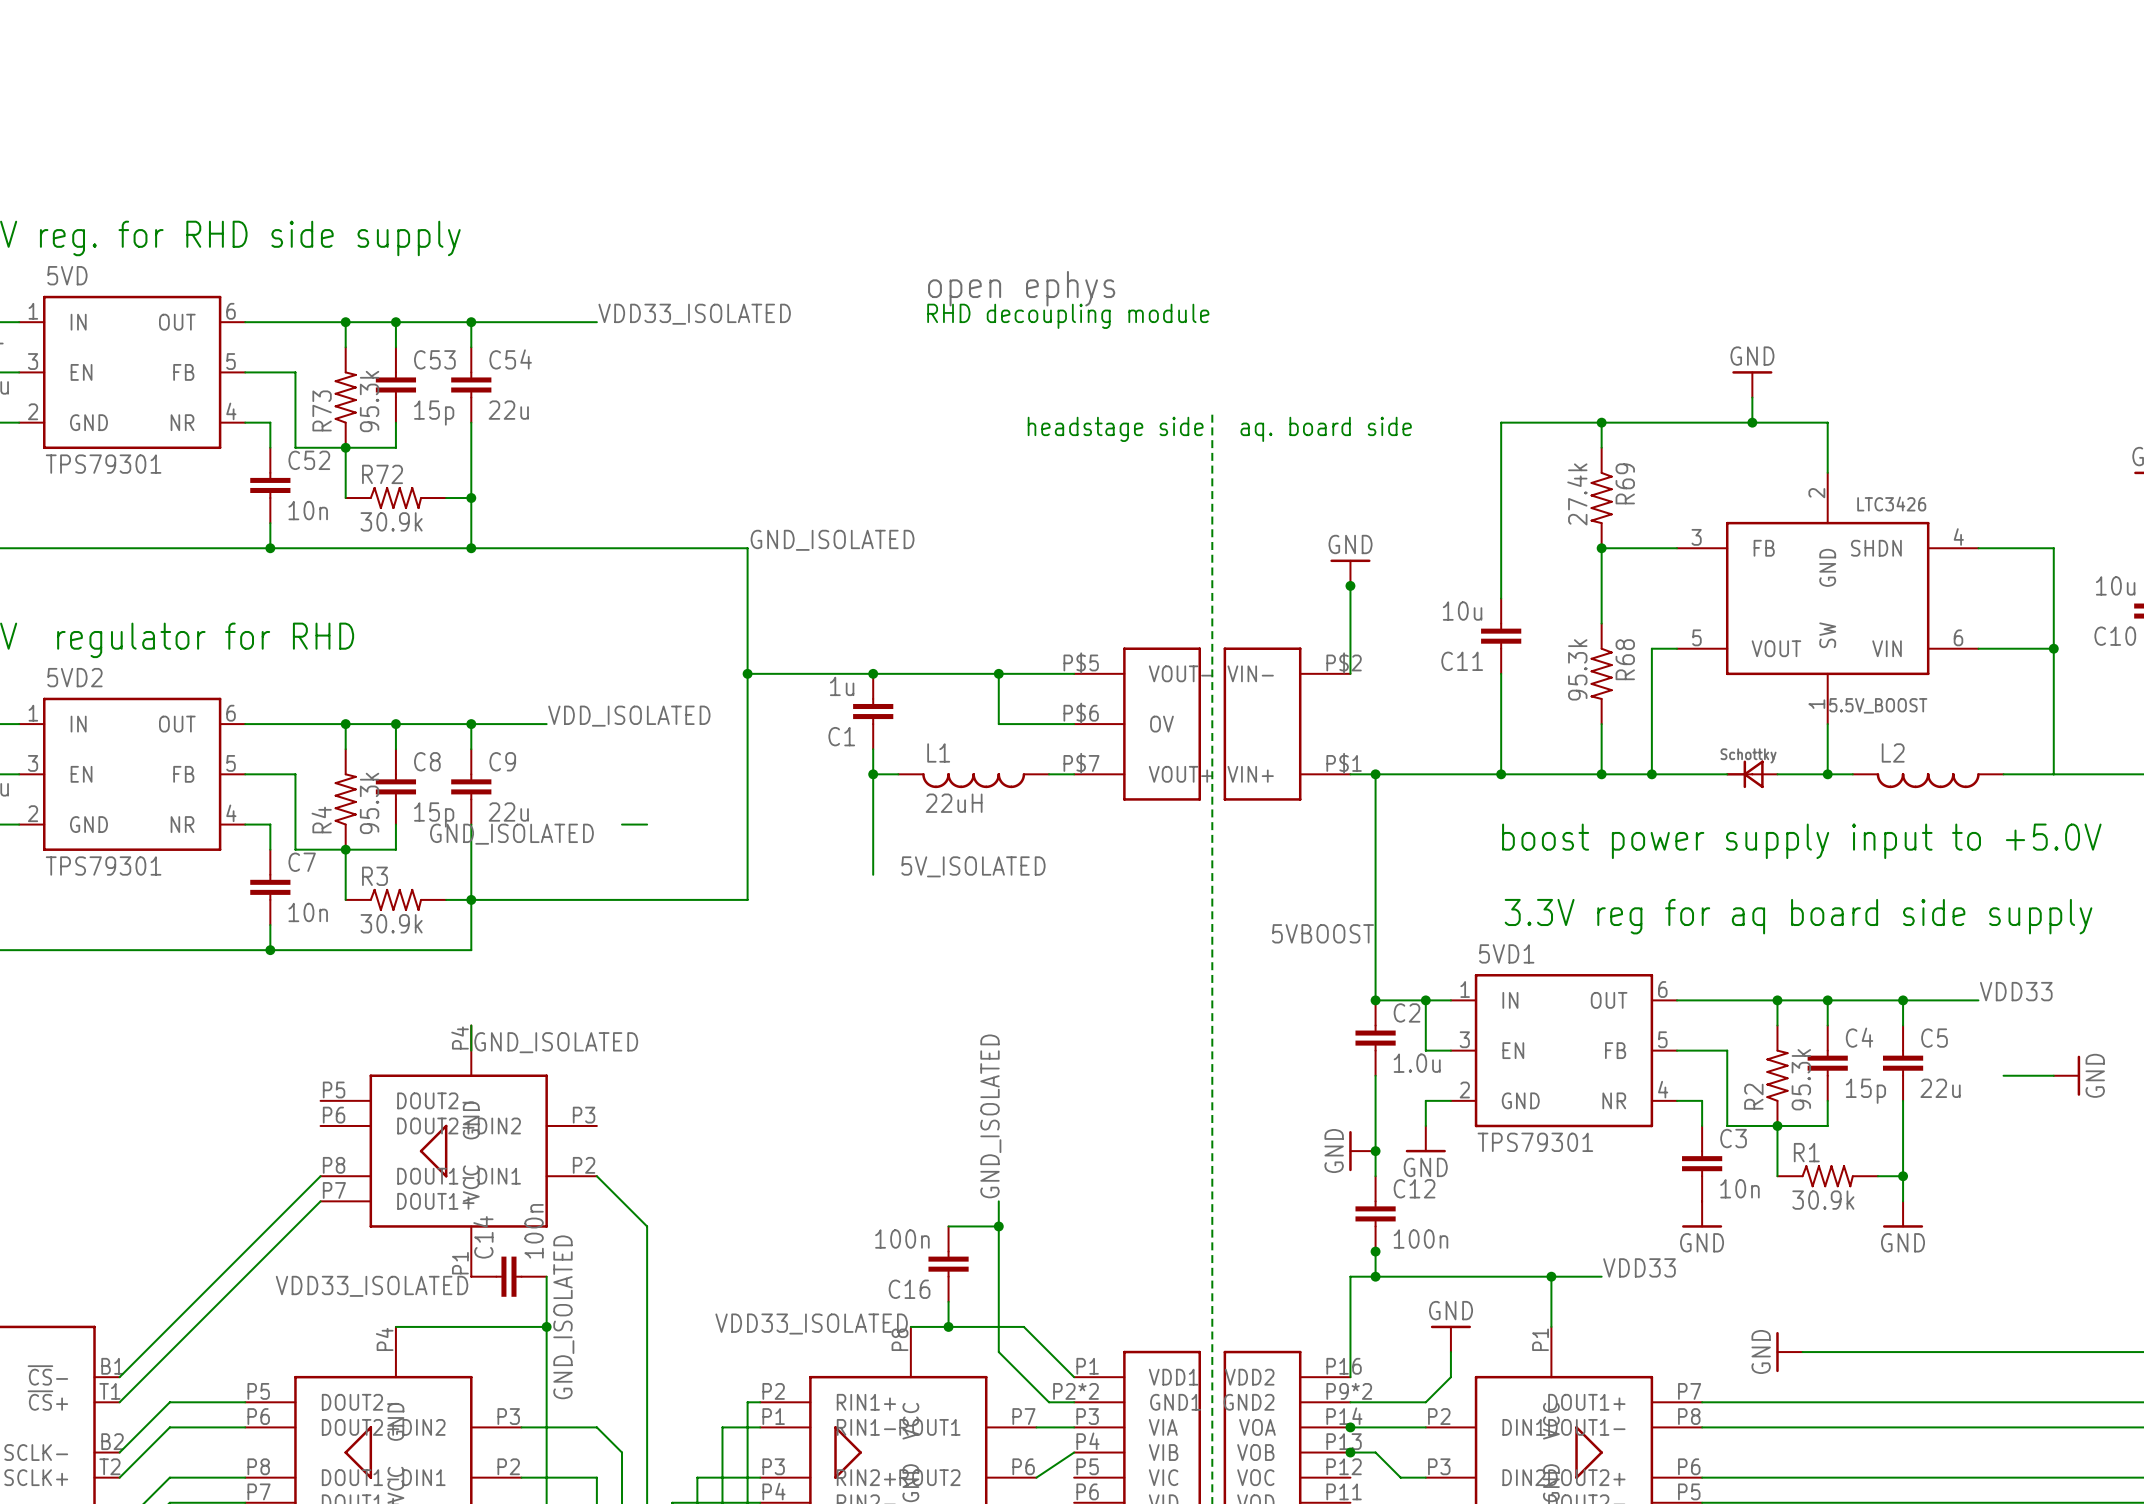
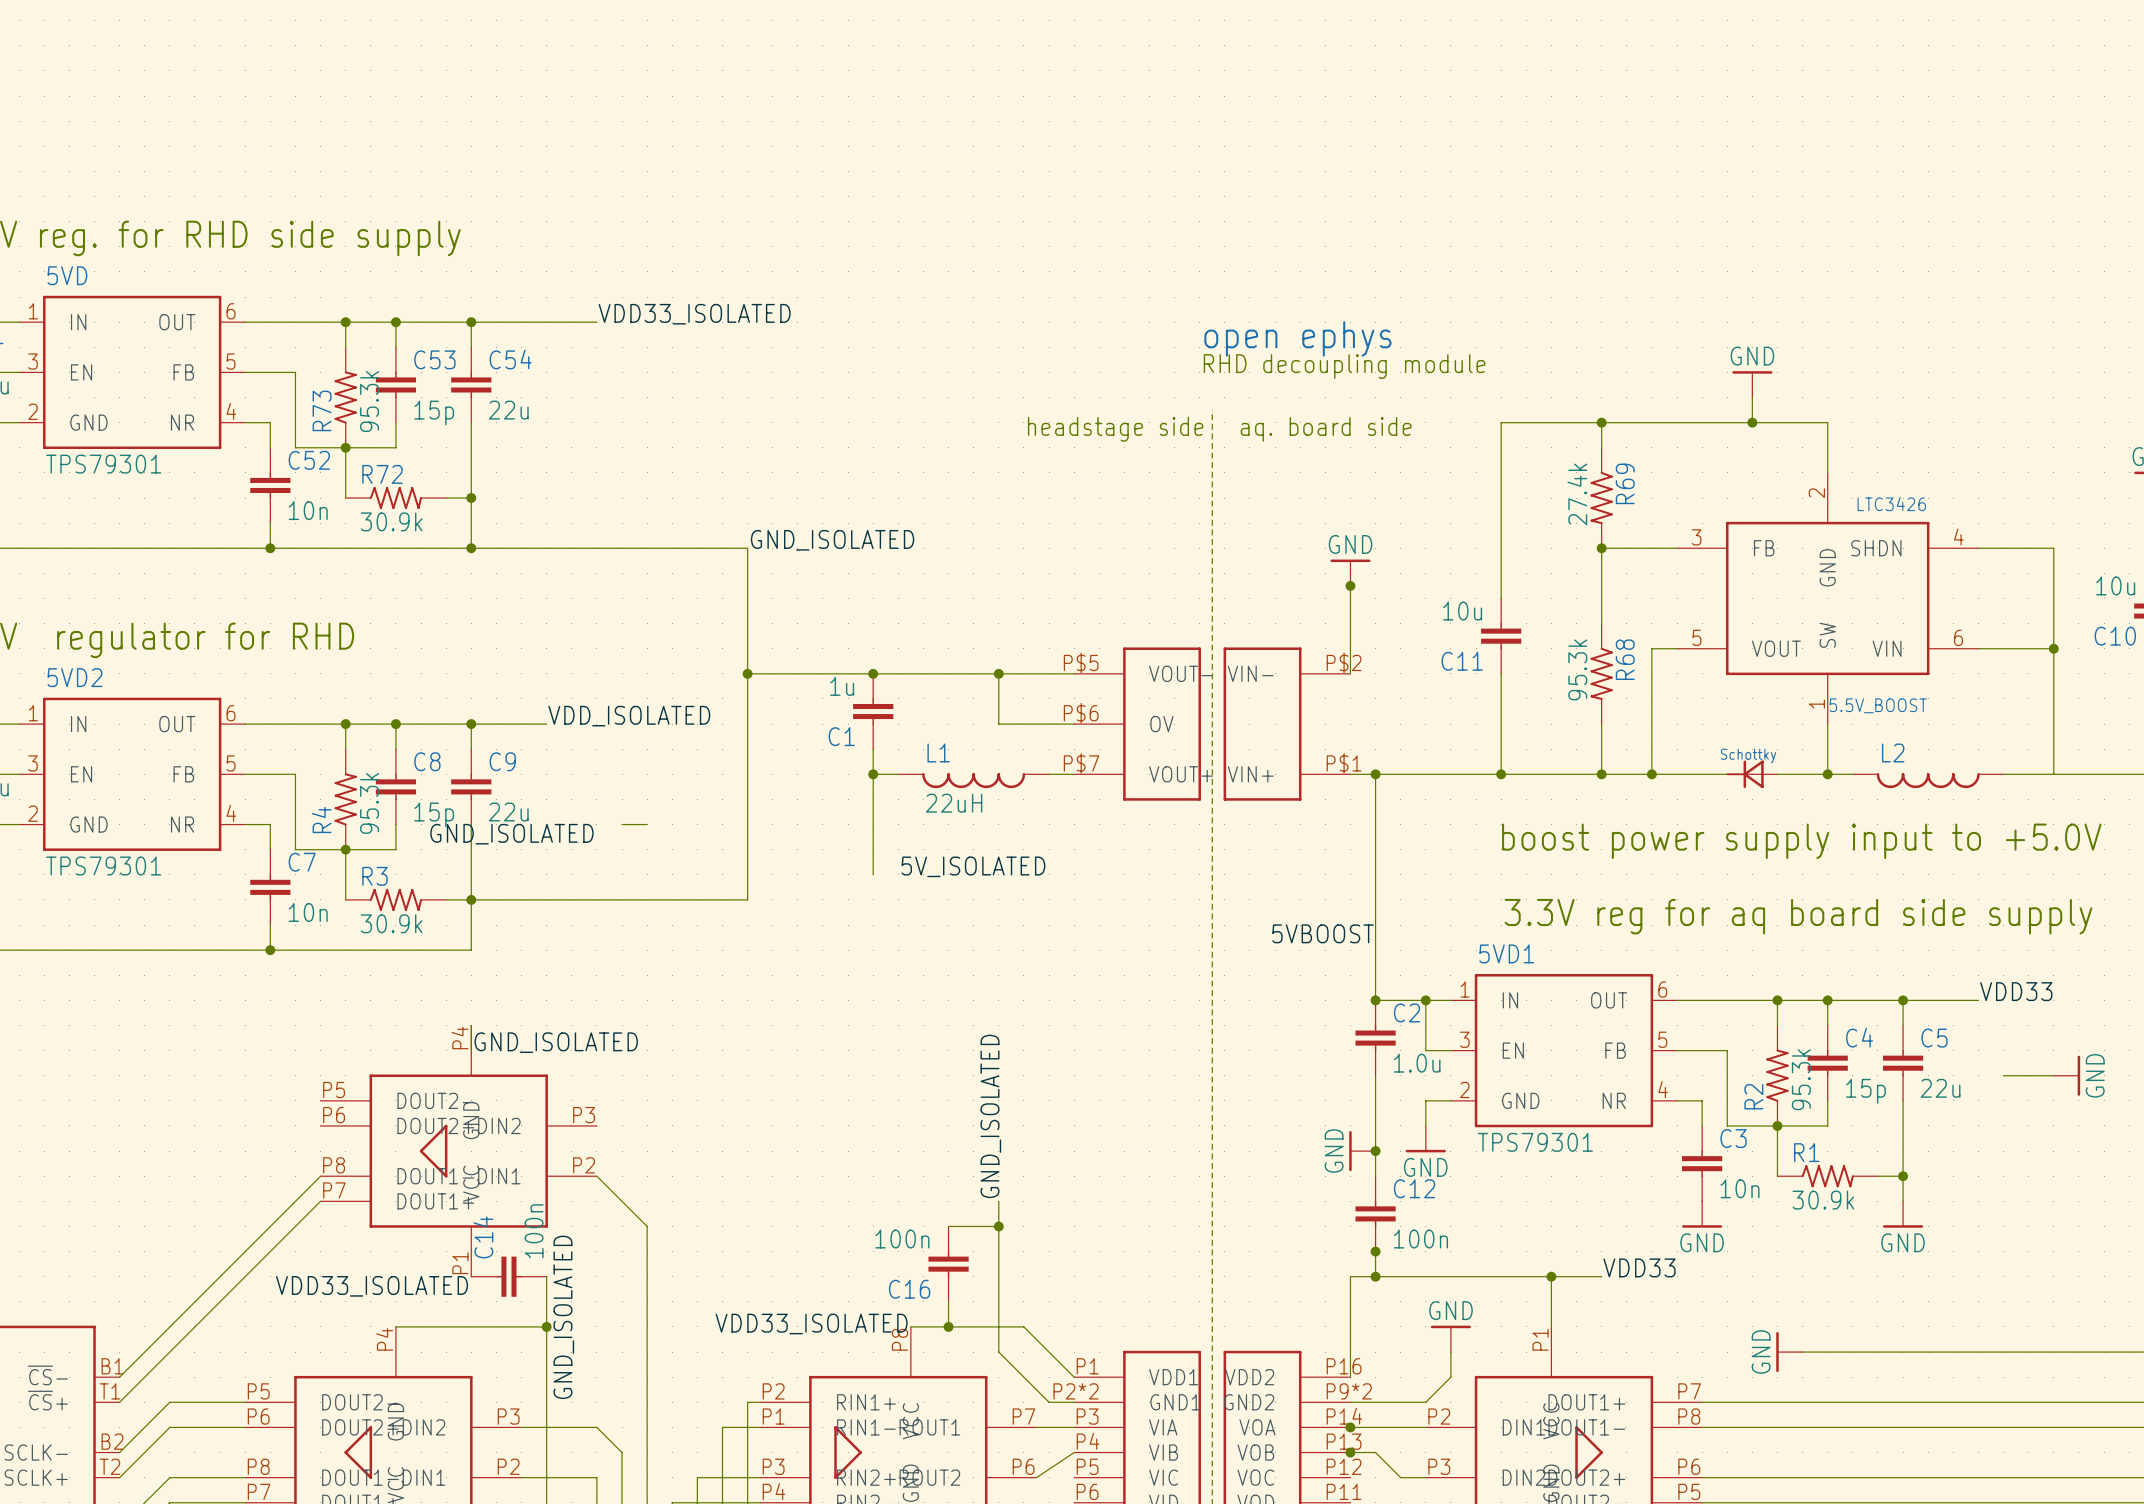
part: (1021, 288) -> none
text: RHD decoupling module (1068, 316) -> none
part: none -> (1297, 338)
text: none -> RHD decoupling module (1344, 366)

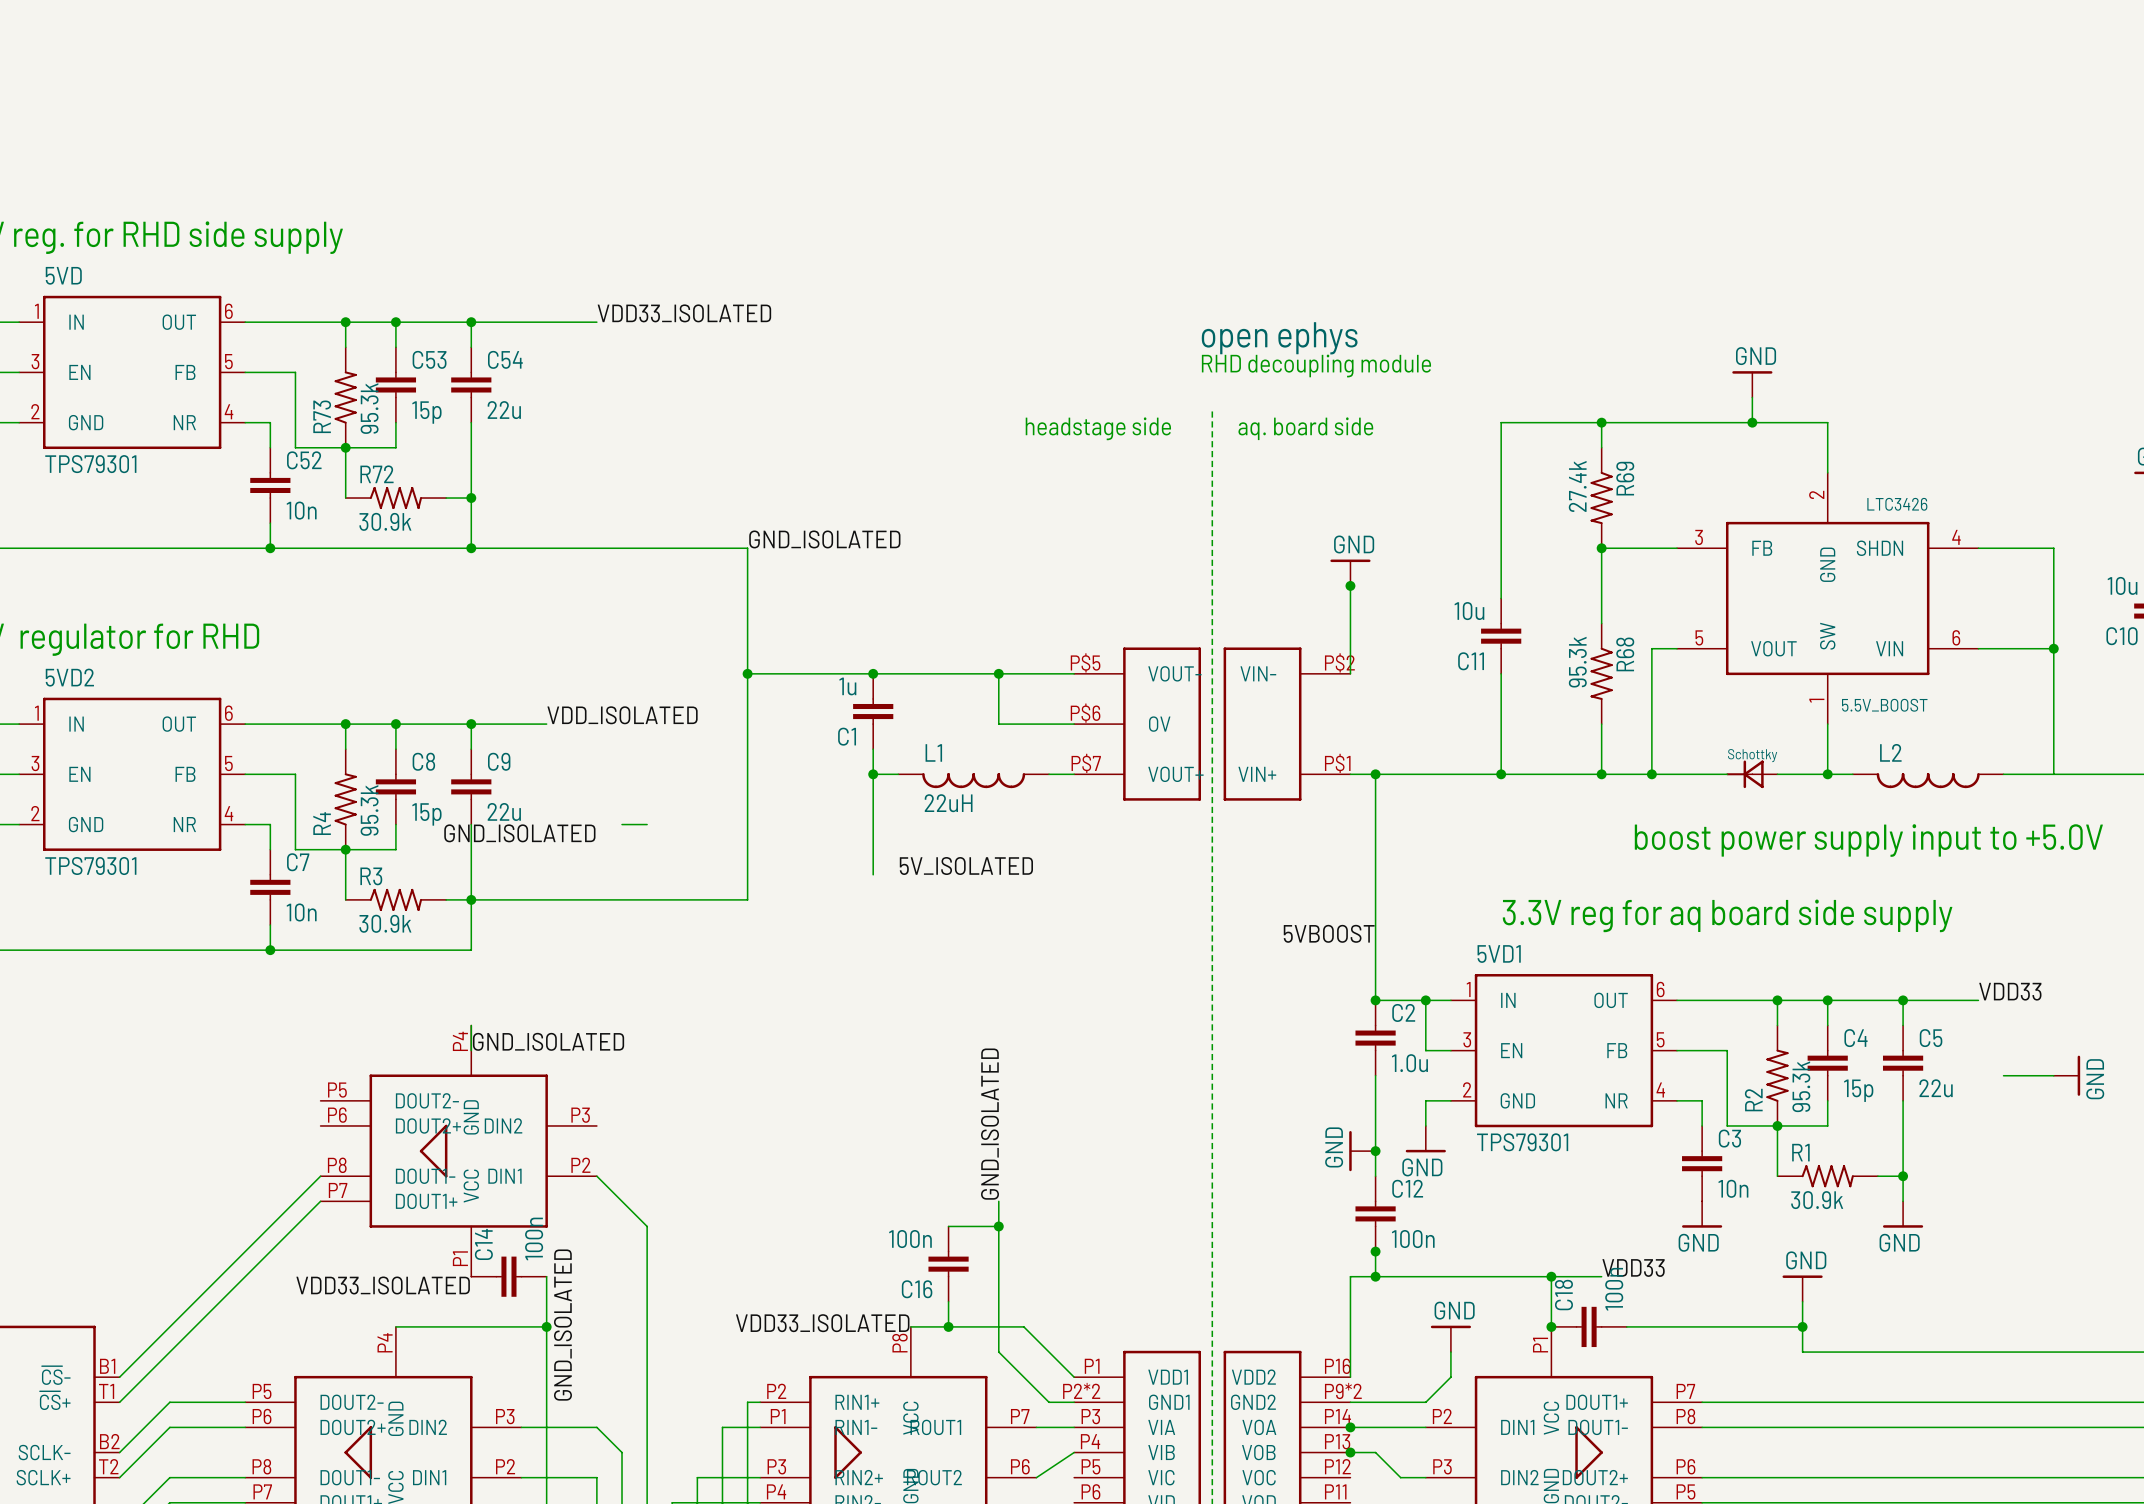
wire: none -> (1802, 1301) (1802, 1352)
junction: none -> (1551, 1326)
C18: none -> 100n (1589, 1326)
wire: none -> (1626, 1326) (1802, 1326)
junction: none -> (1802, 1326)
power symbol rotation: 0° (1777, 1352) -> 90° clockwise (1802, 1276)
power symbol position: GND (1789, 1352) -> GND (1802, 1288)

